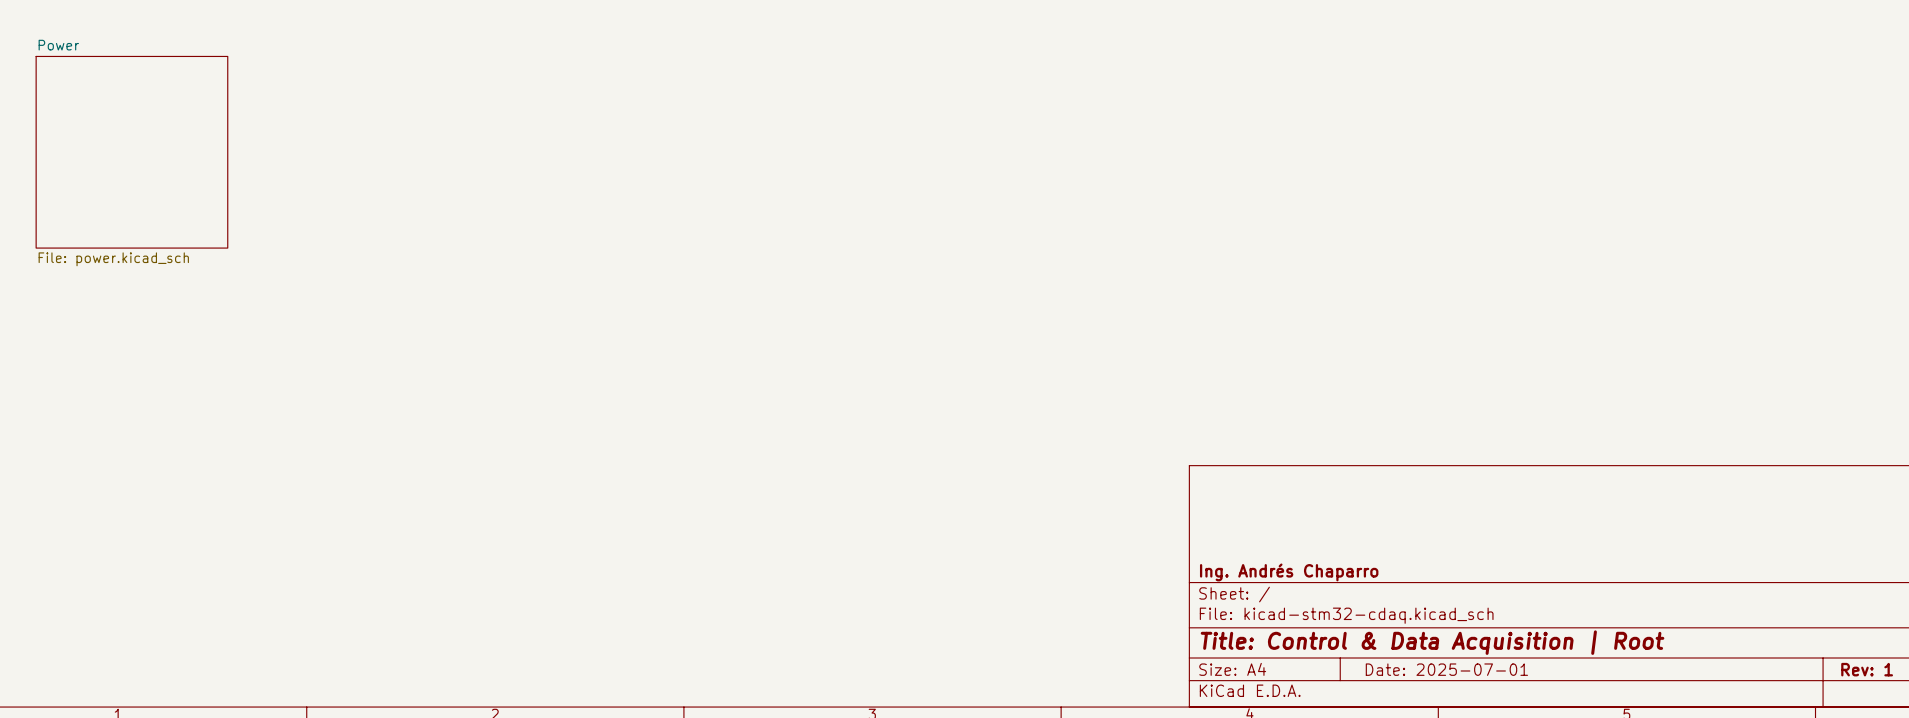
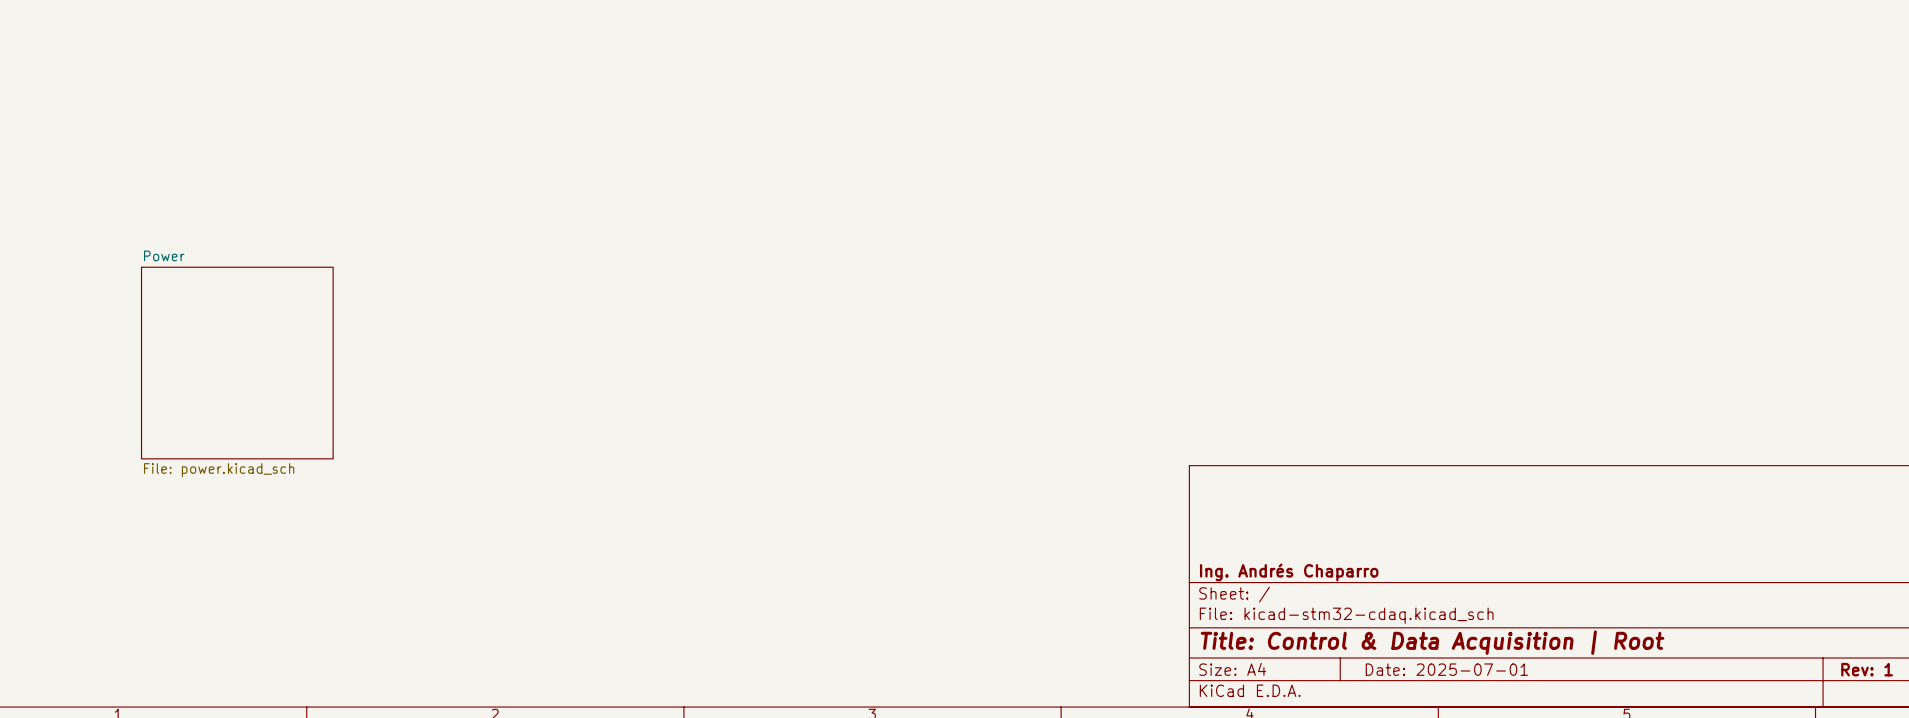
sheet Power: File: power.kicad_sch (131, 152) -> none
sheet Power: none -> File: power.kicad_sch (237, 363)

